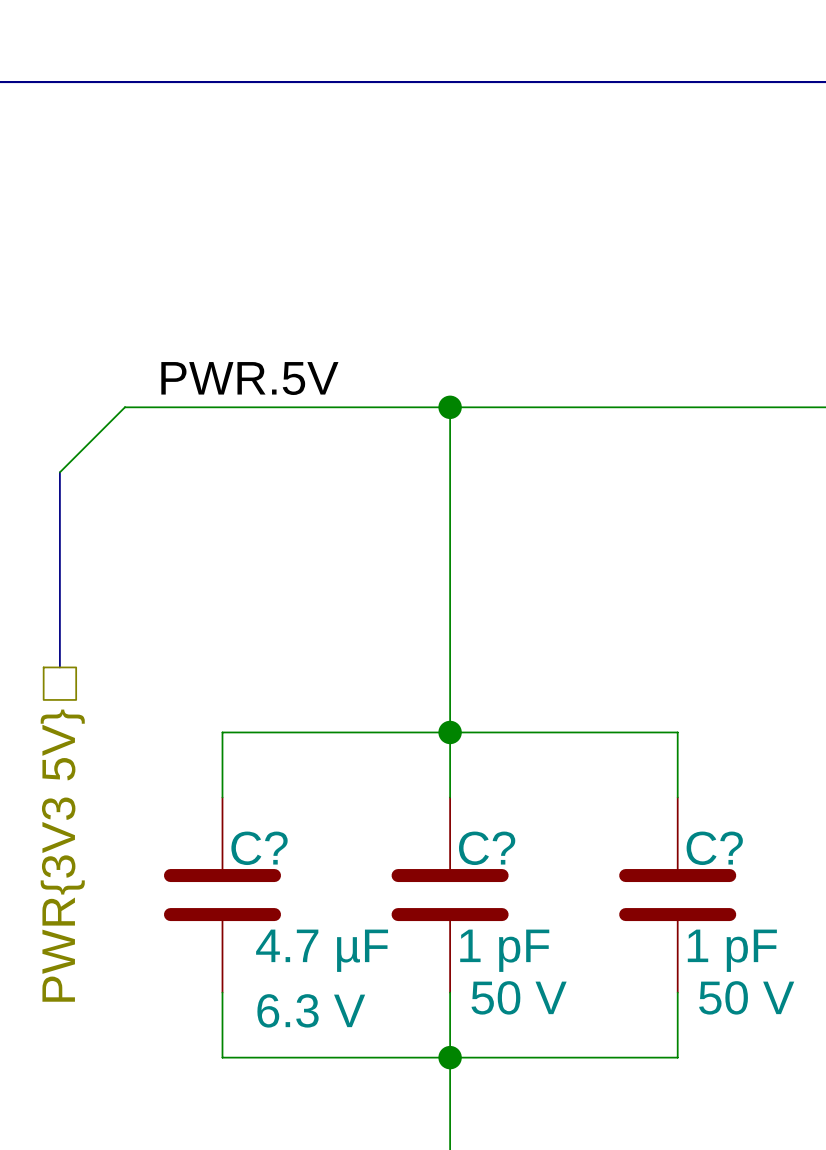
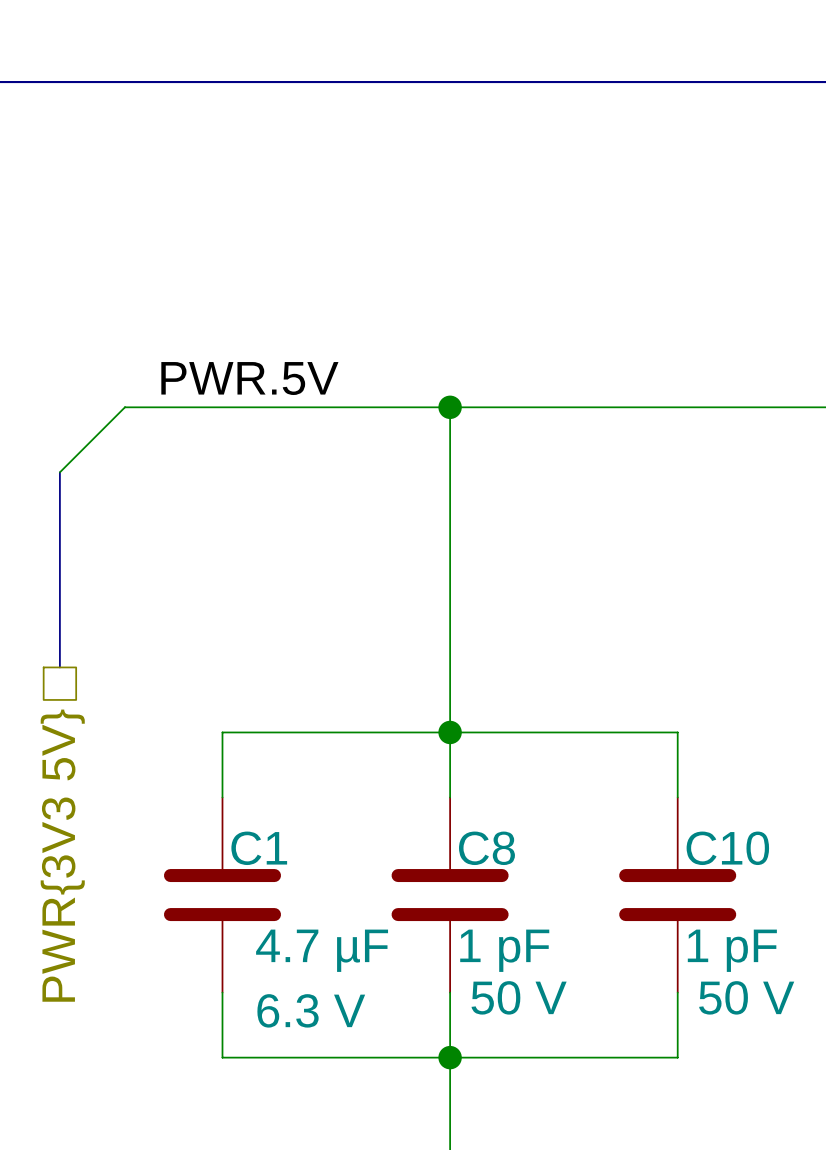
C? name: C? (259, 848) -> C1 (259, 848)
C? name: C? (487, 848) -> C8 (486, 848)
C? name: C? (714, 848) -> C10 (727, 848)

